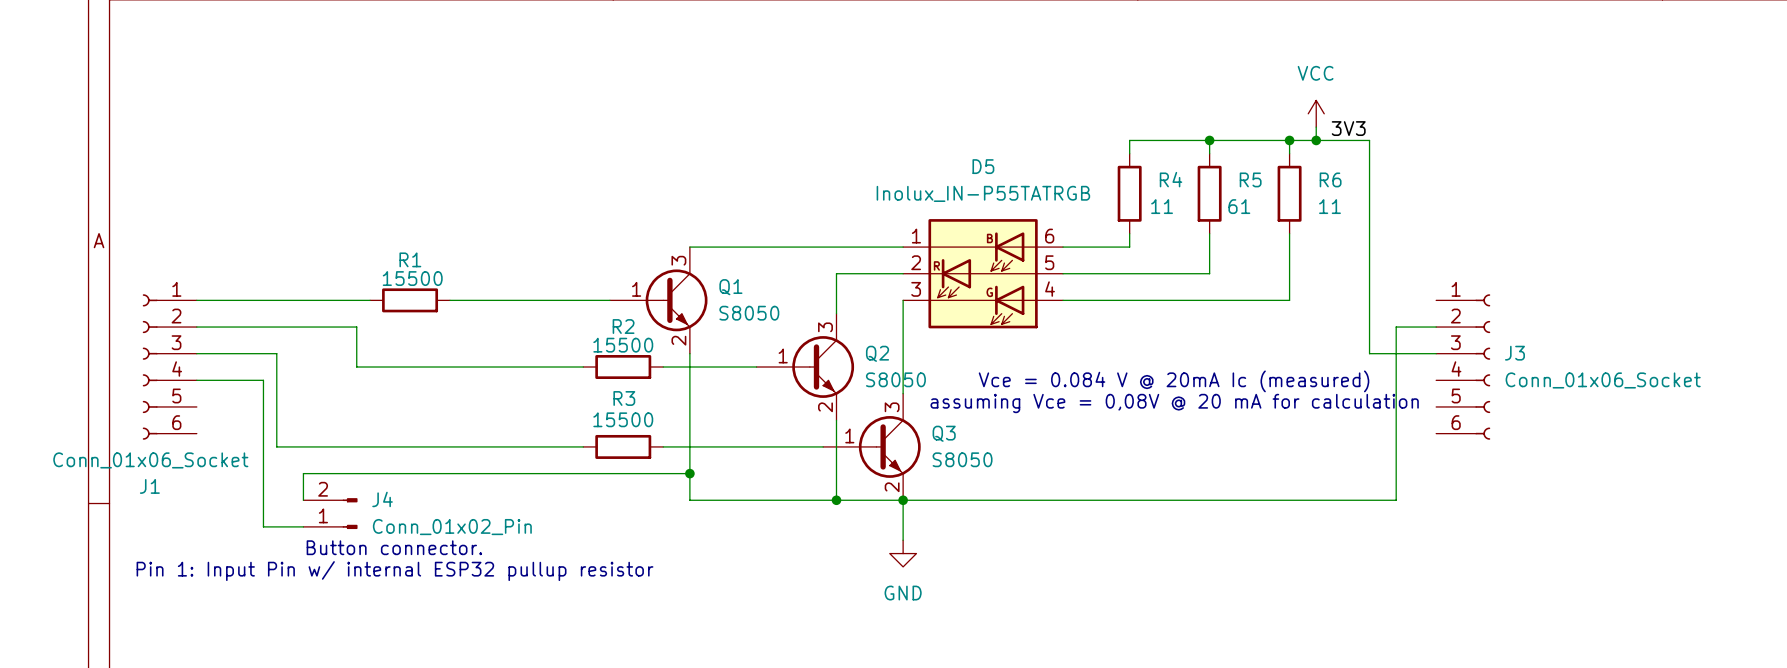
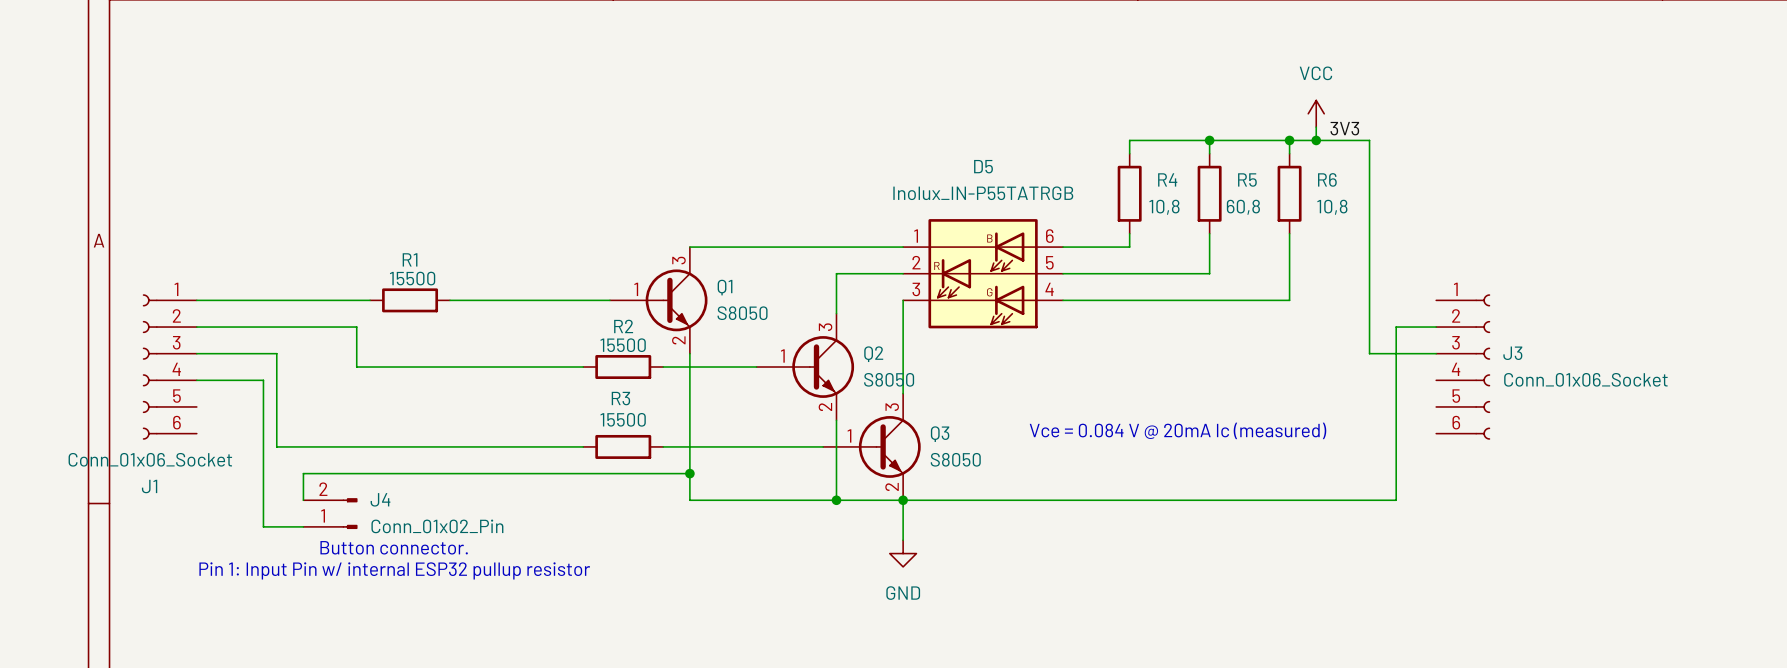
R4 value: 11 (1162, 206) -> 10,8 (1164, 207)
R5 value: 61 (1239, 206) -> 60,8 (1243, 207)
R6 value: 11 (1329, 206) -> 10,8 (1332, 207)
text position: Vce = 0.084 V @ 20mA Ic (measured) (1174, 381) -> Vce = 0.084 V @ 20mA Ic (measured) (1178, 430)
text: assuming Vce = 0,08V @ 20 mA for calculation (1174, 403) -> none

